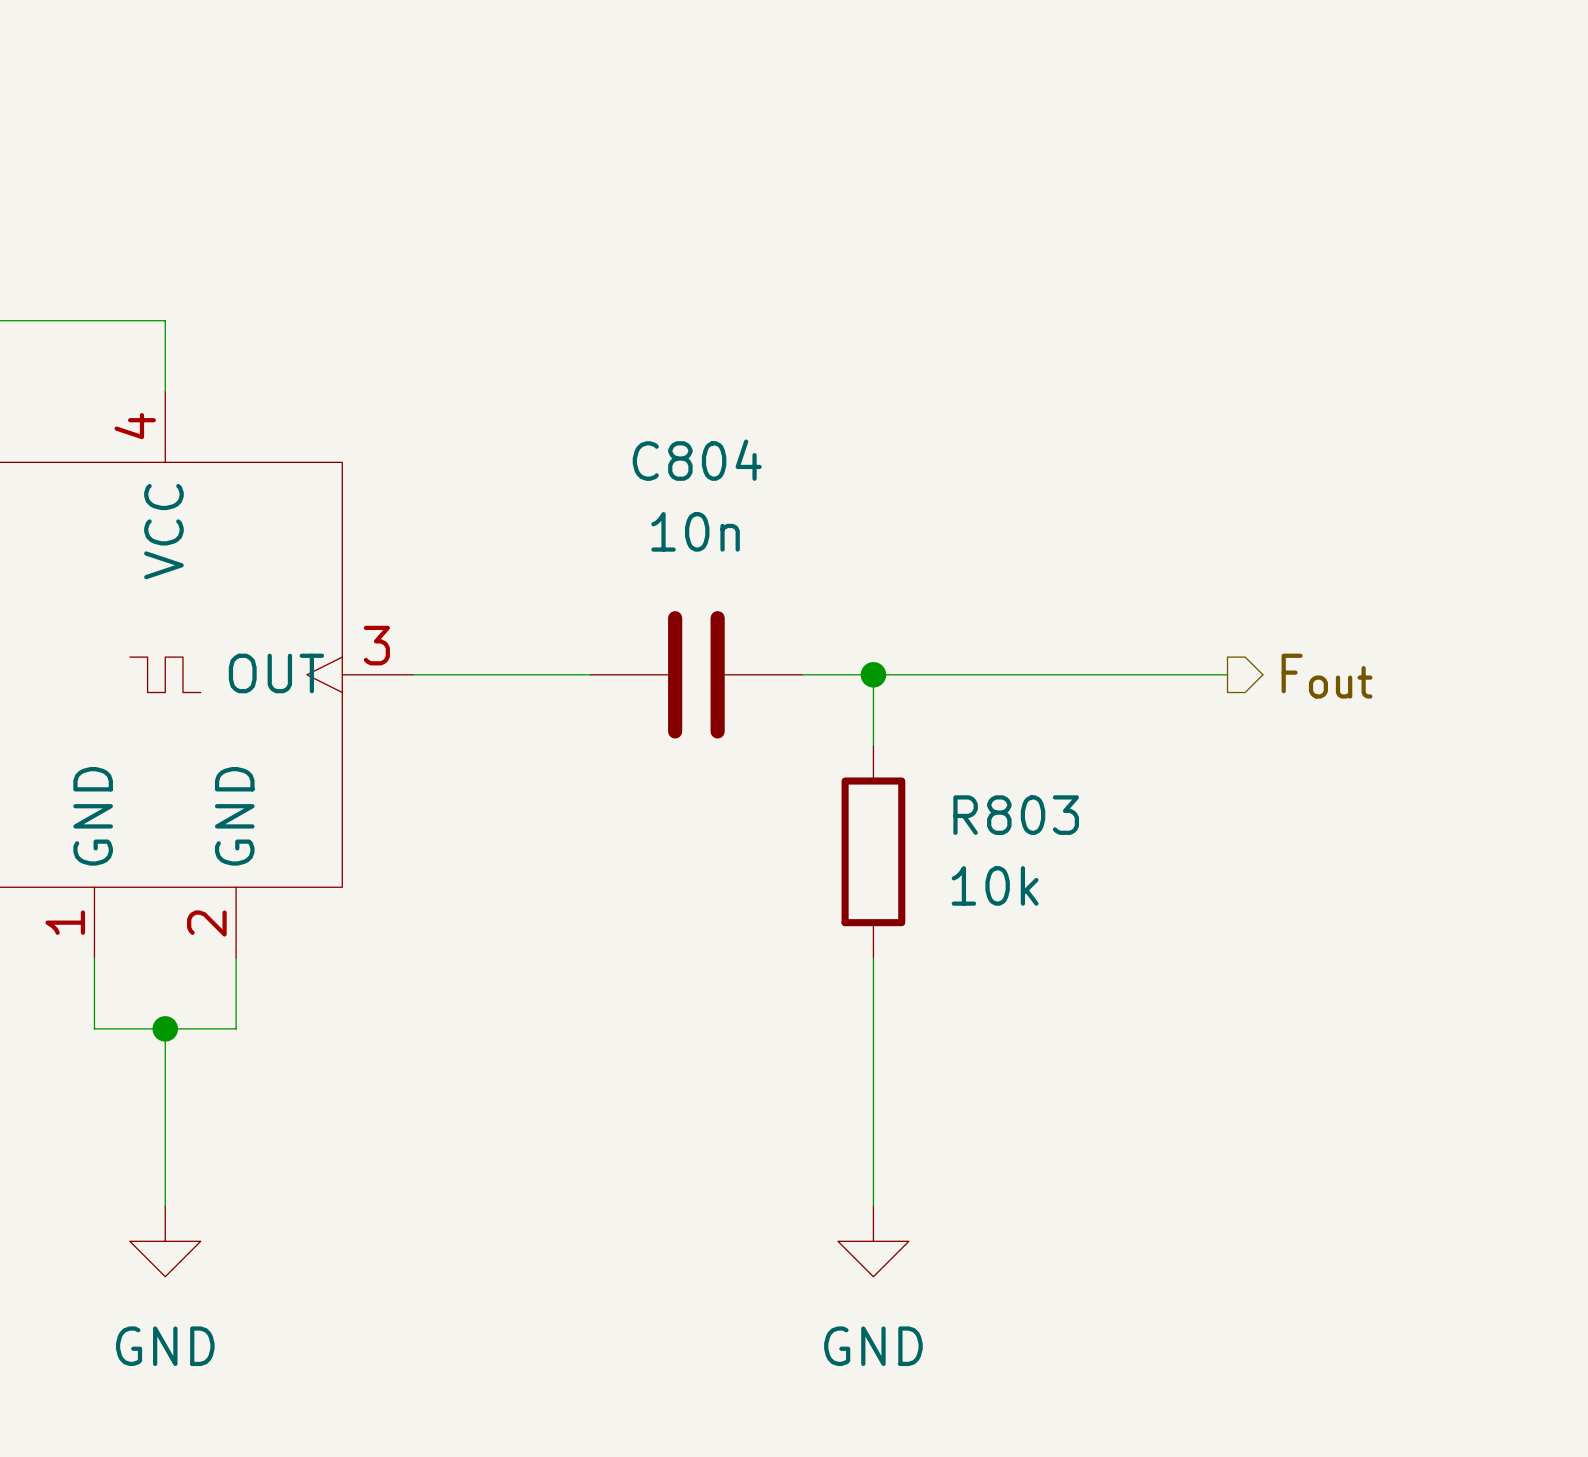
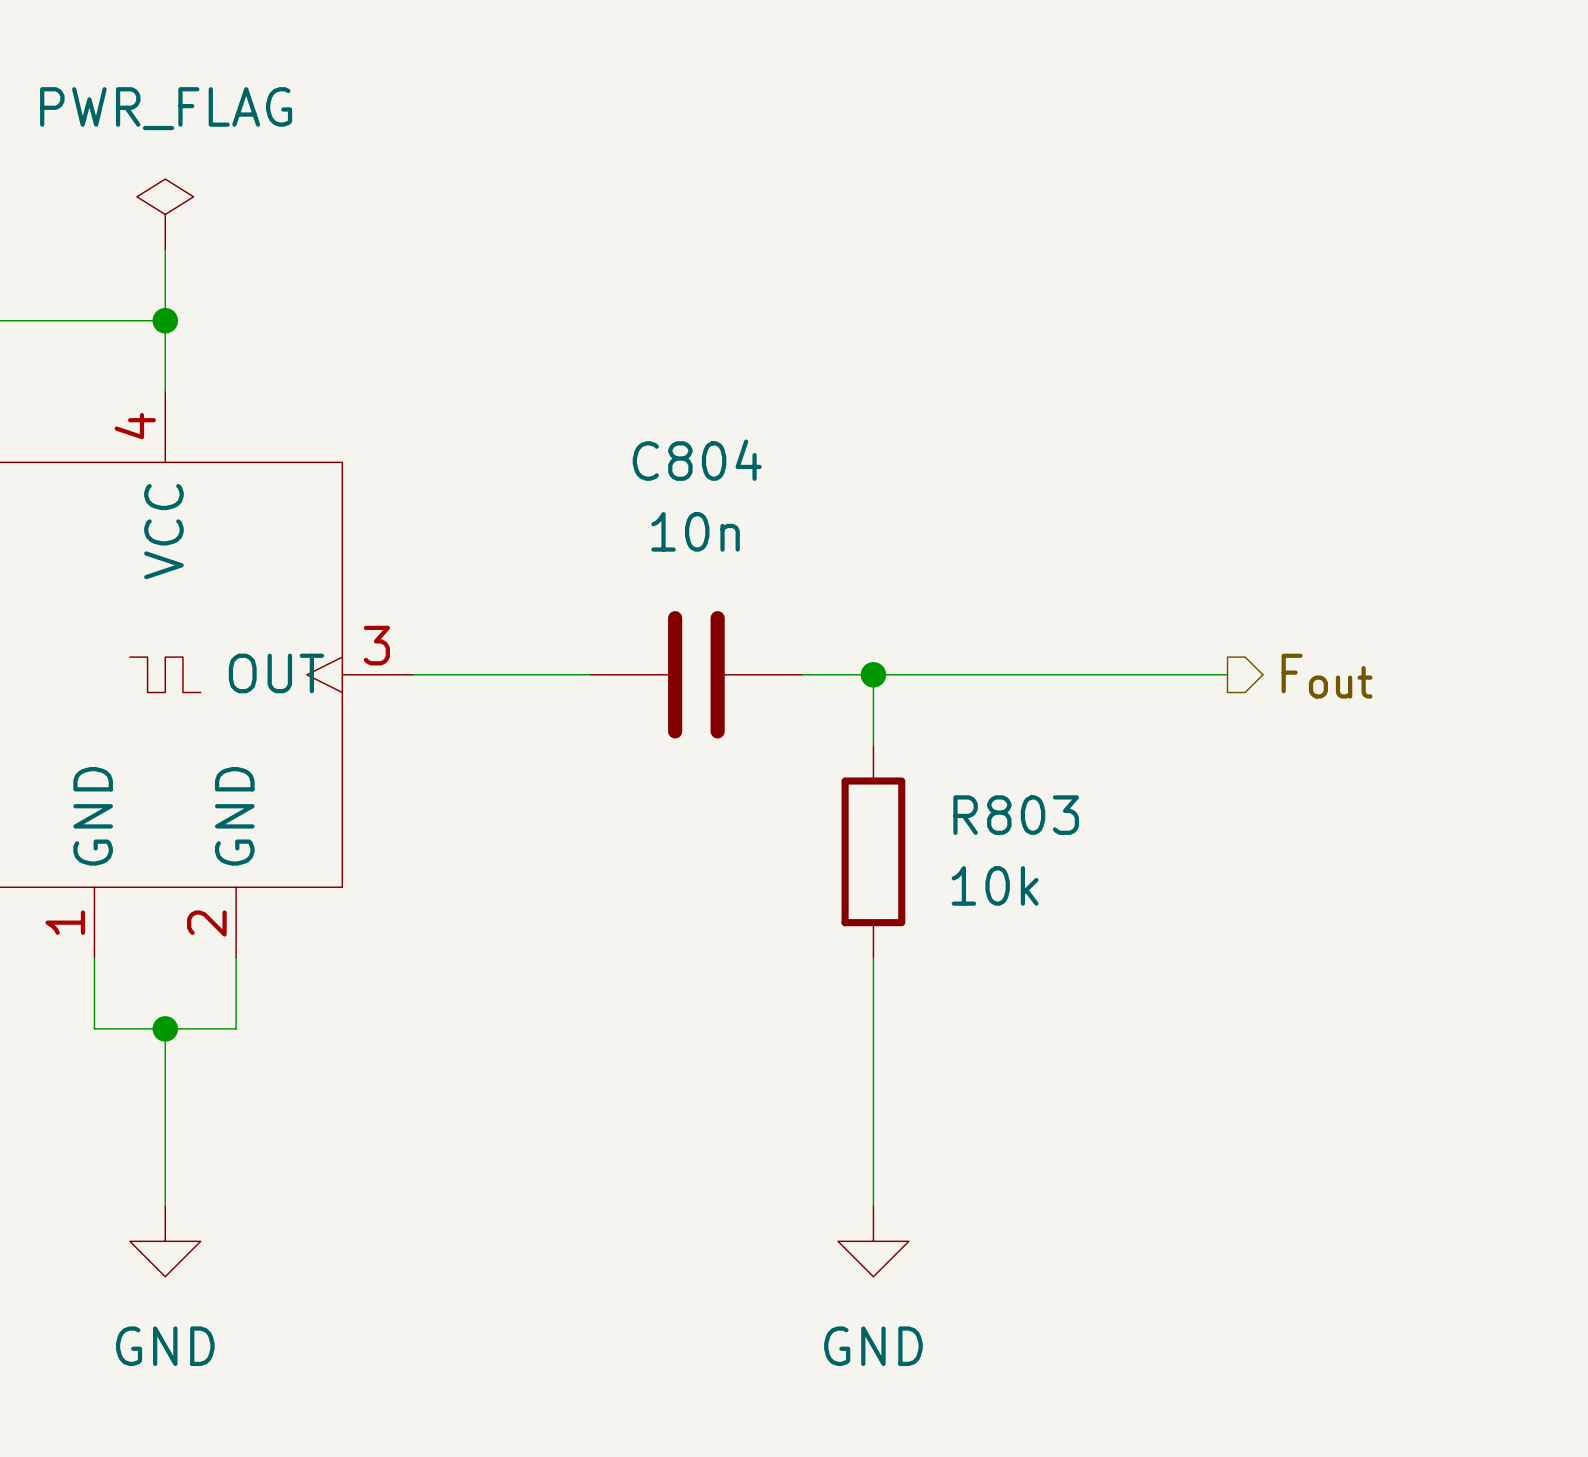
power symbol: none -> PWR_FLAG (165, 214)
wire: none -> (165, 249) (165, 320)
junction: none -> (165, 320)

